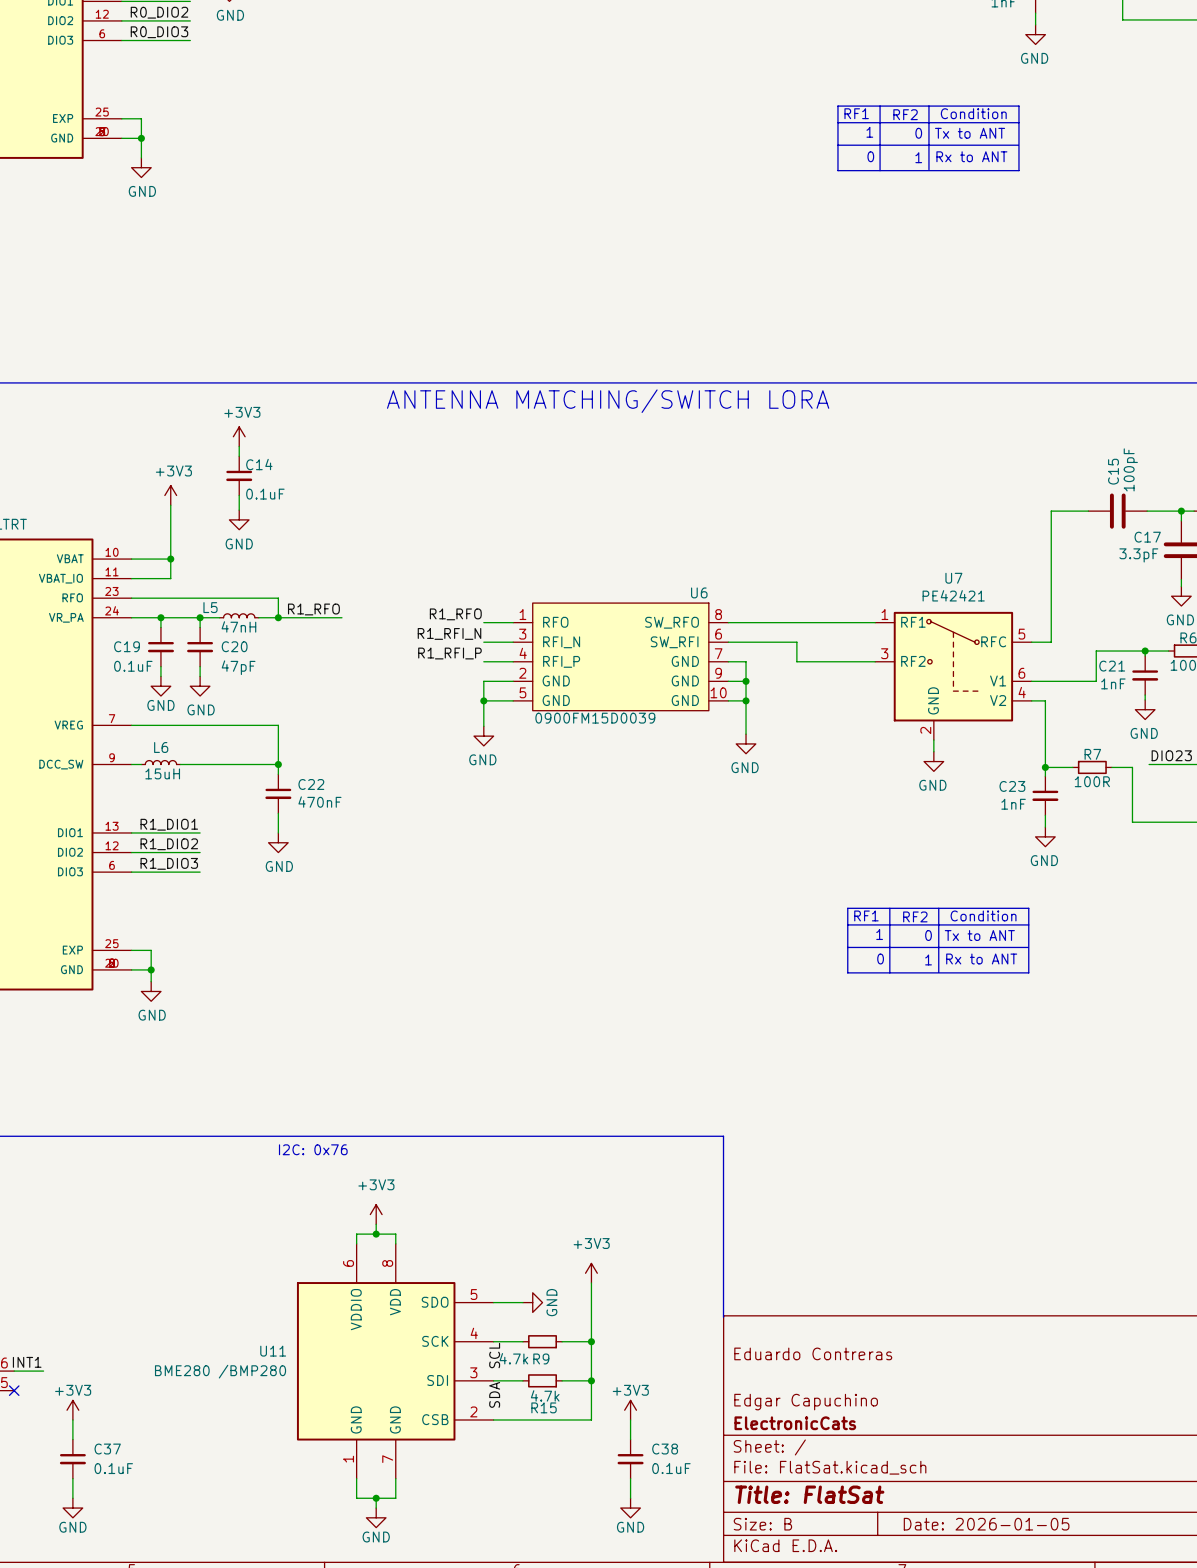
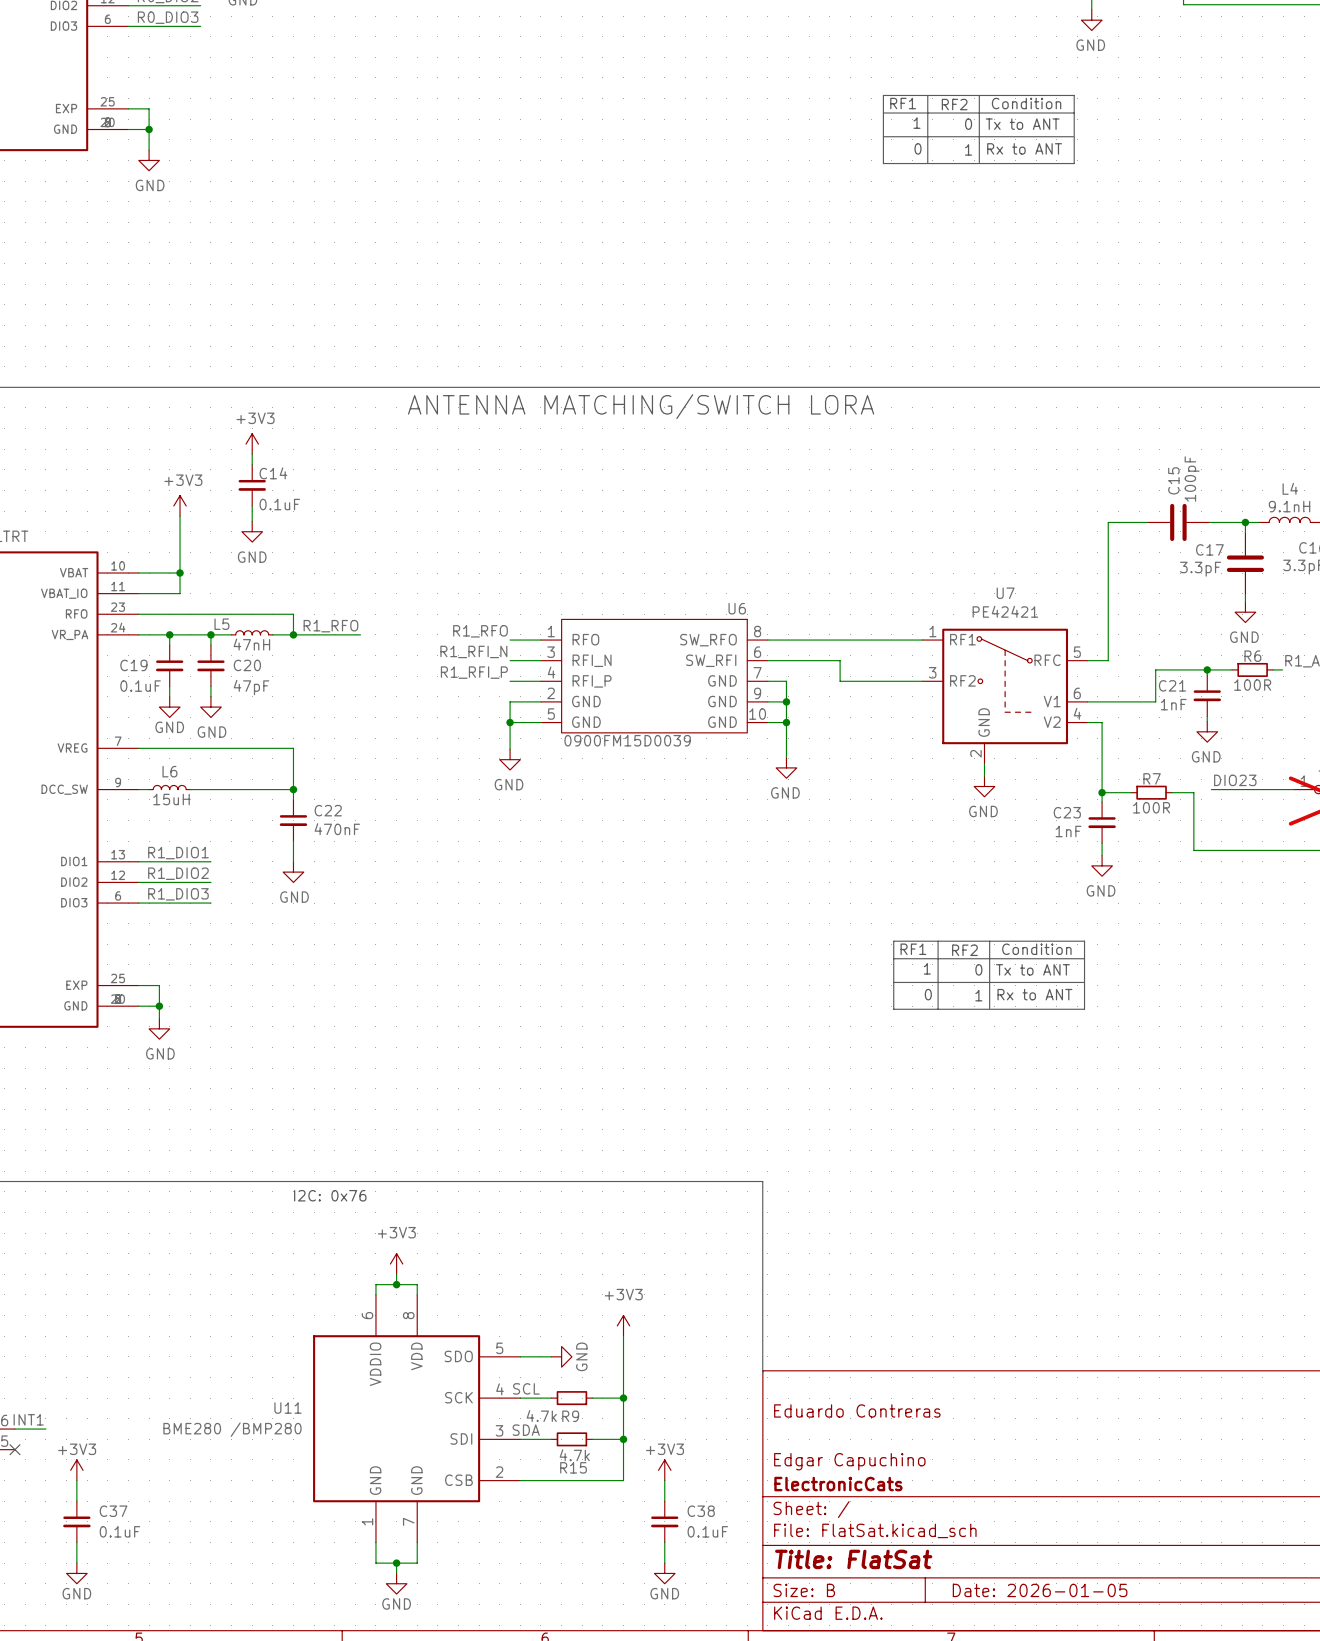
label rotation: 0° (494, 1355) -> 90° clockwise (526, 1388)
label rotation: 0° (494, 1394) -> 90° clockwise (526, 1430)

